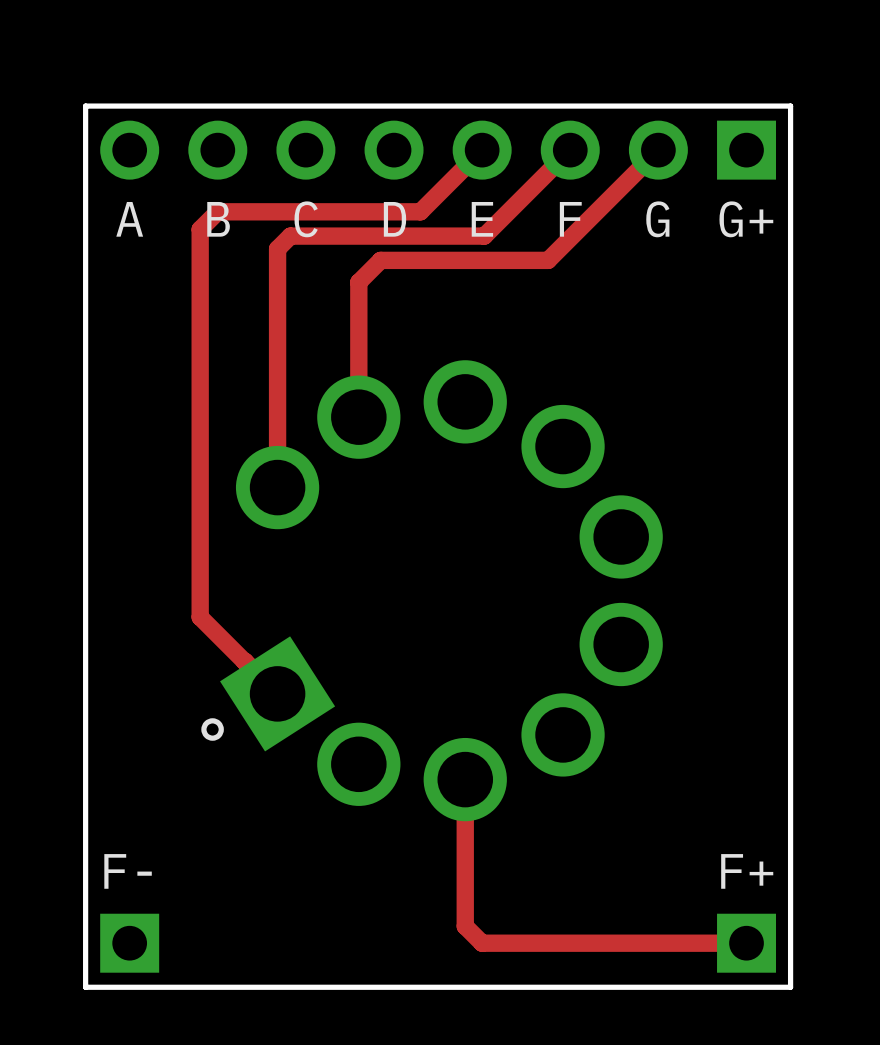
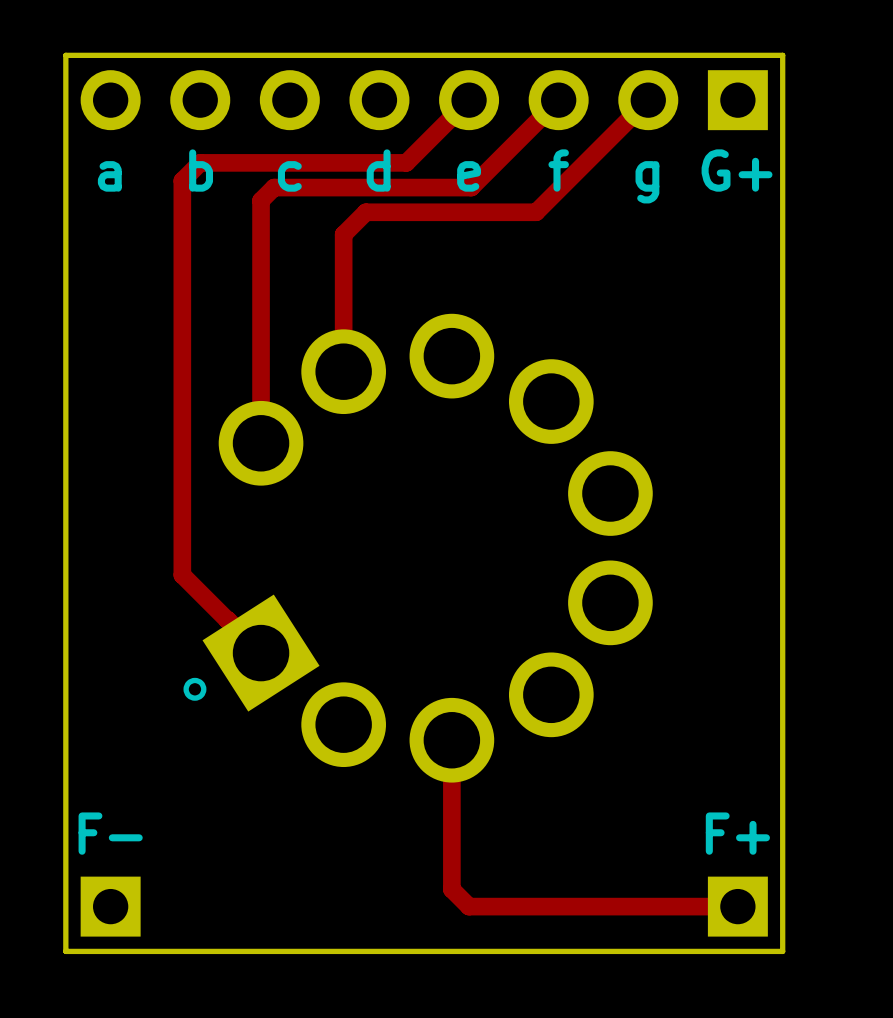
text: A (129, 219) -> a (109, 176)
text: B (218, 219) -> b (201, 170)
text: C (306, 219) -> c (289, 176)
text: D (395, 219) -> d (378, 170)
text: E (482, 219) -> e (469, 176)
text: F (570, 219) -> f (558, 170)
text: G (657, 219) -> g (647, 182)

